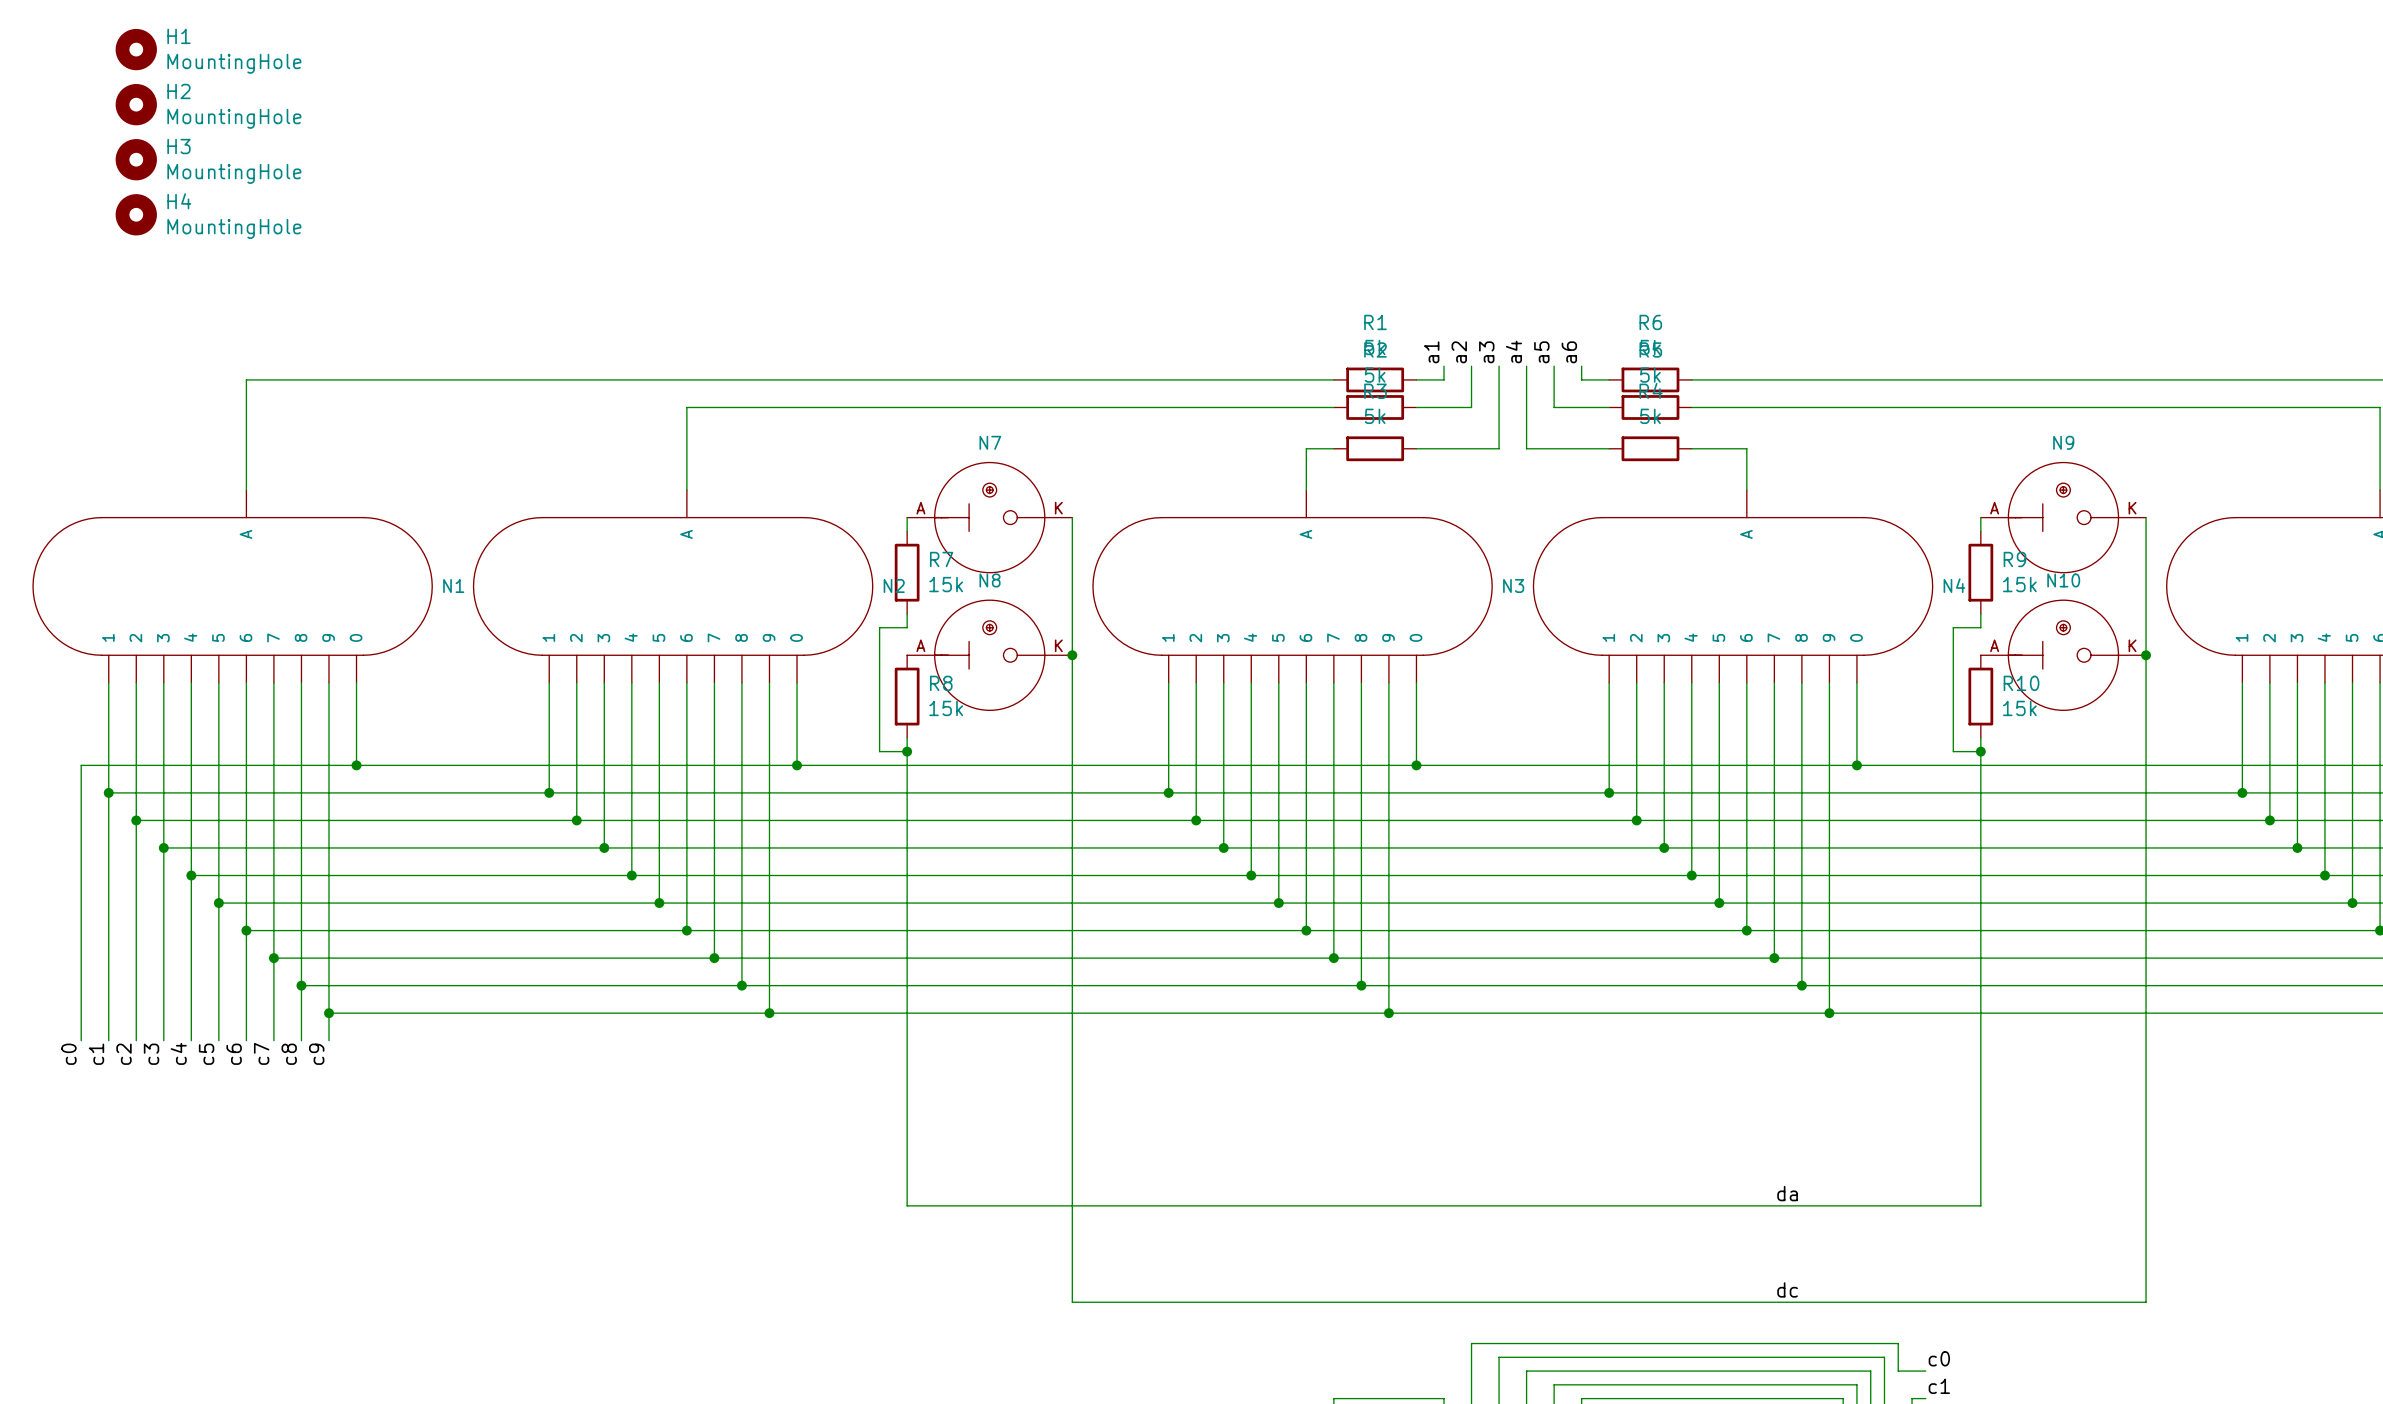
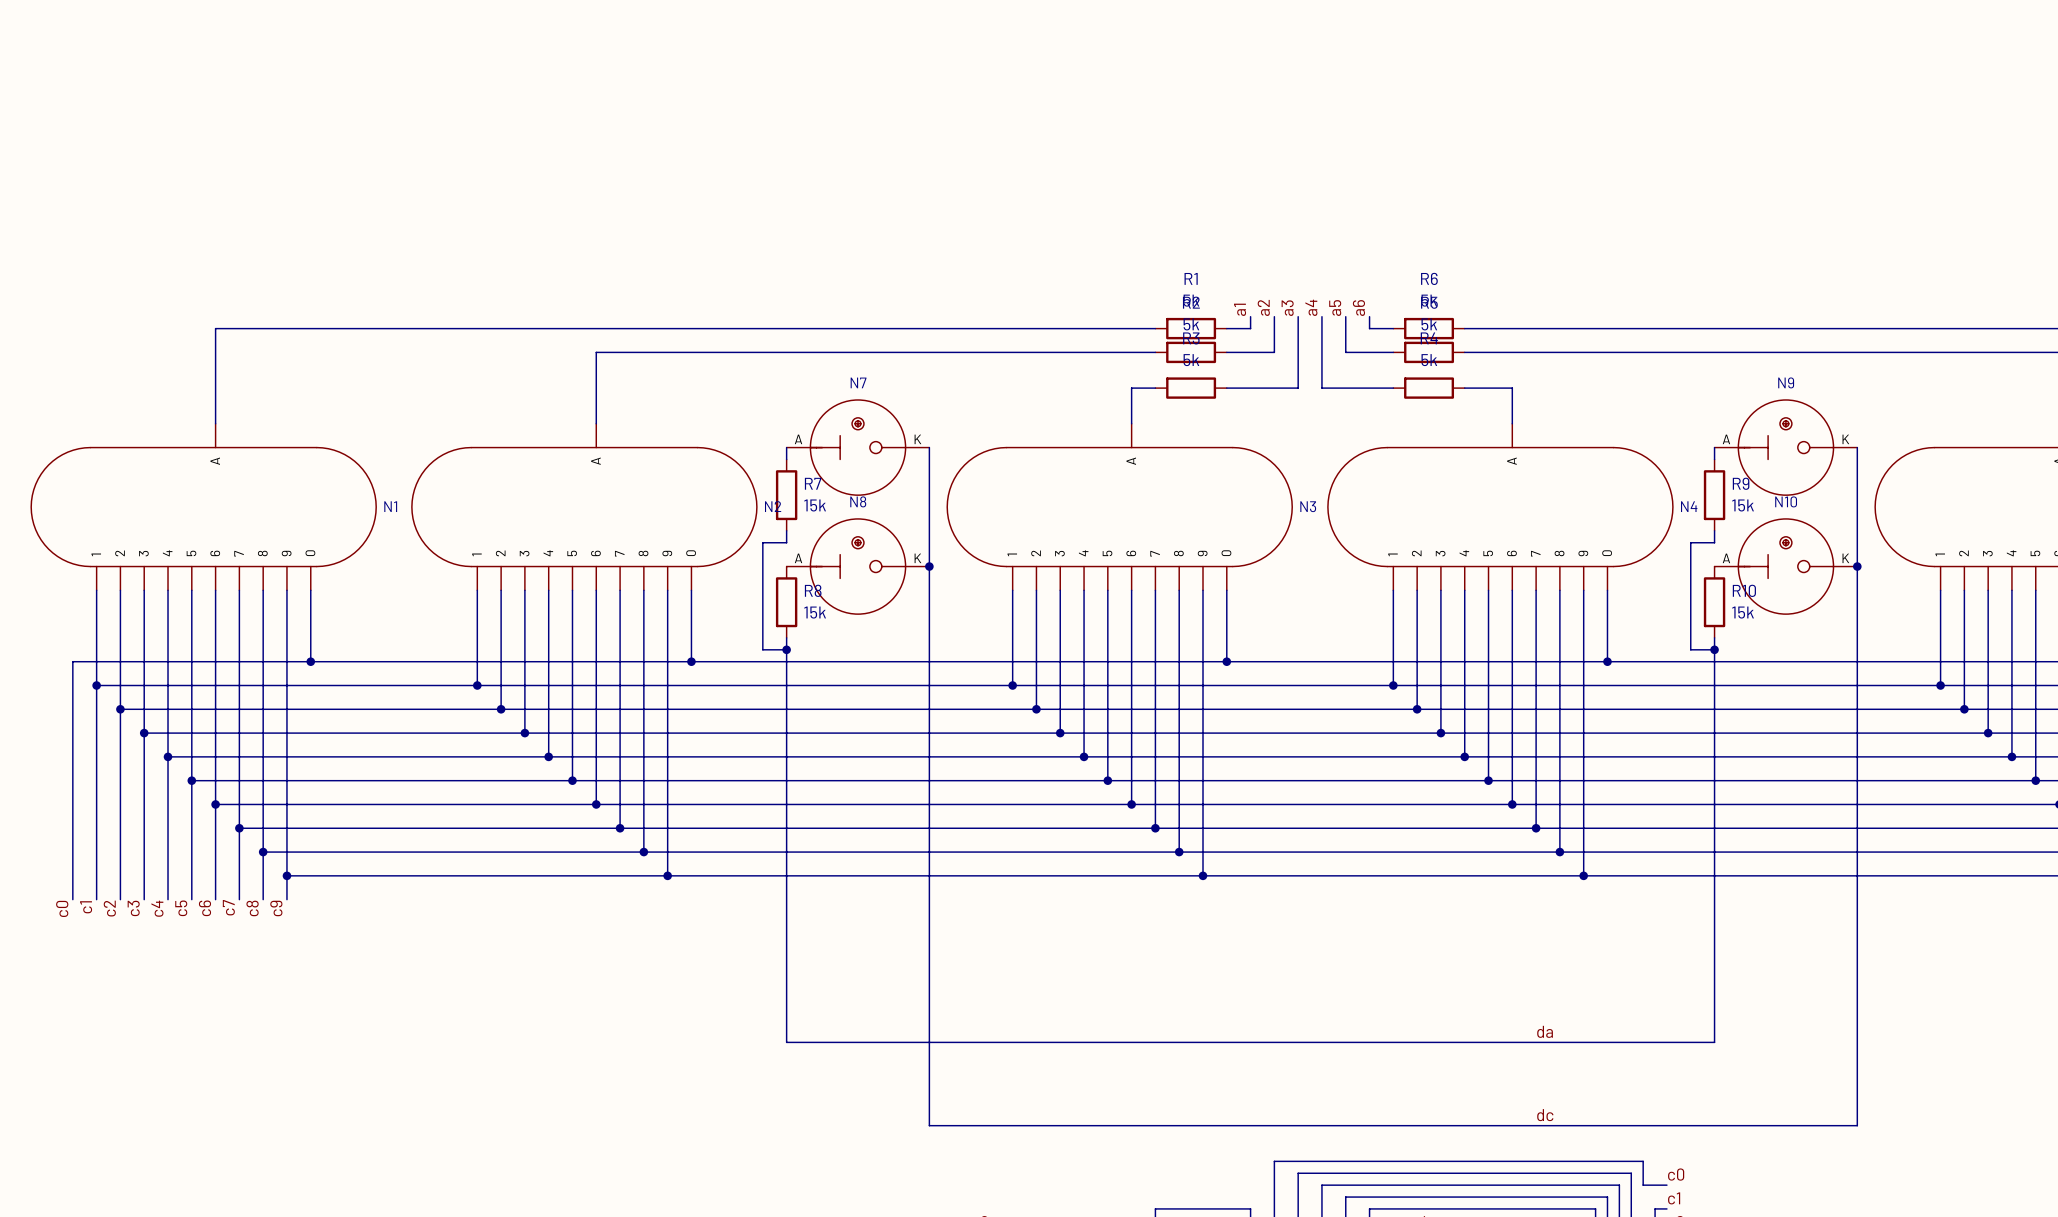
H1: MountingHole (136, 49) -> none
H2: MountingHole (136, 104) -> none
H3: MountingHole (136, 159) -> none
H4: MountingHole (136, 214) -> none

